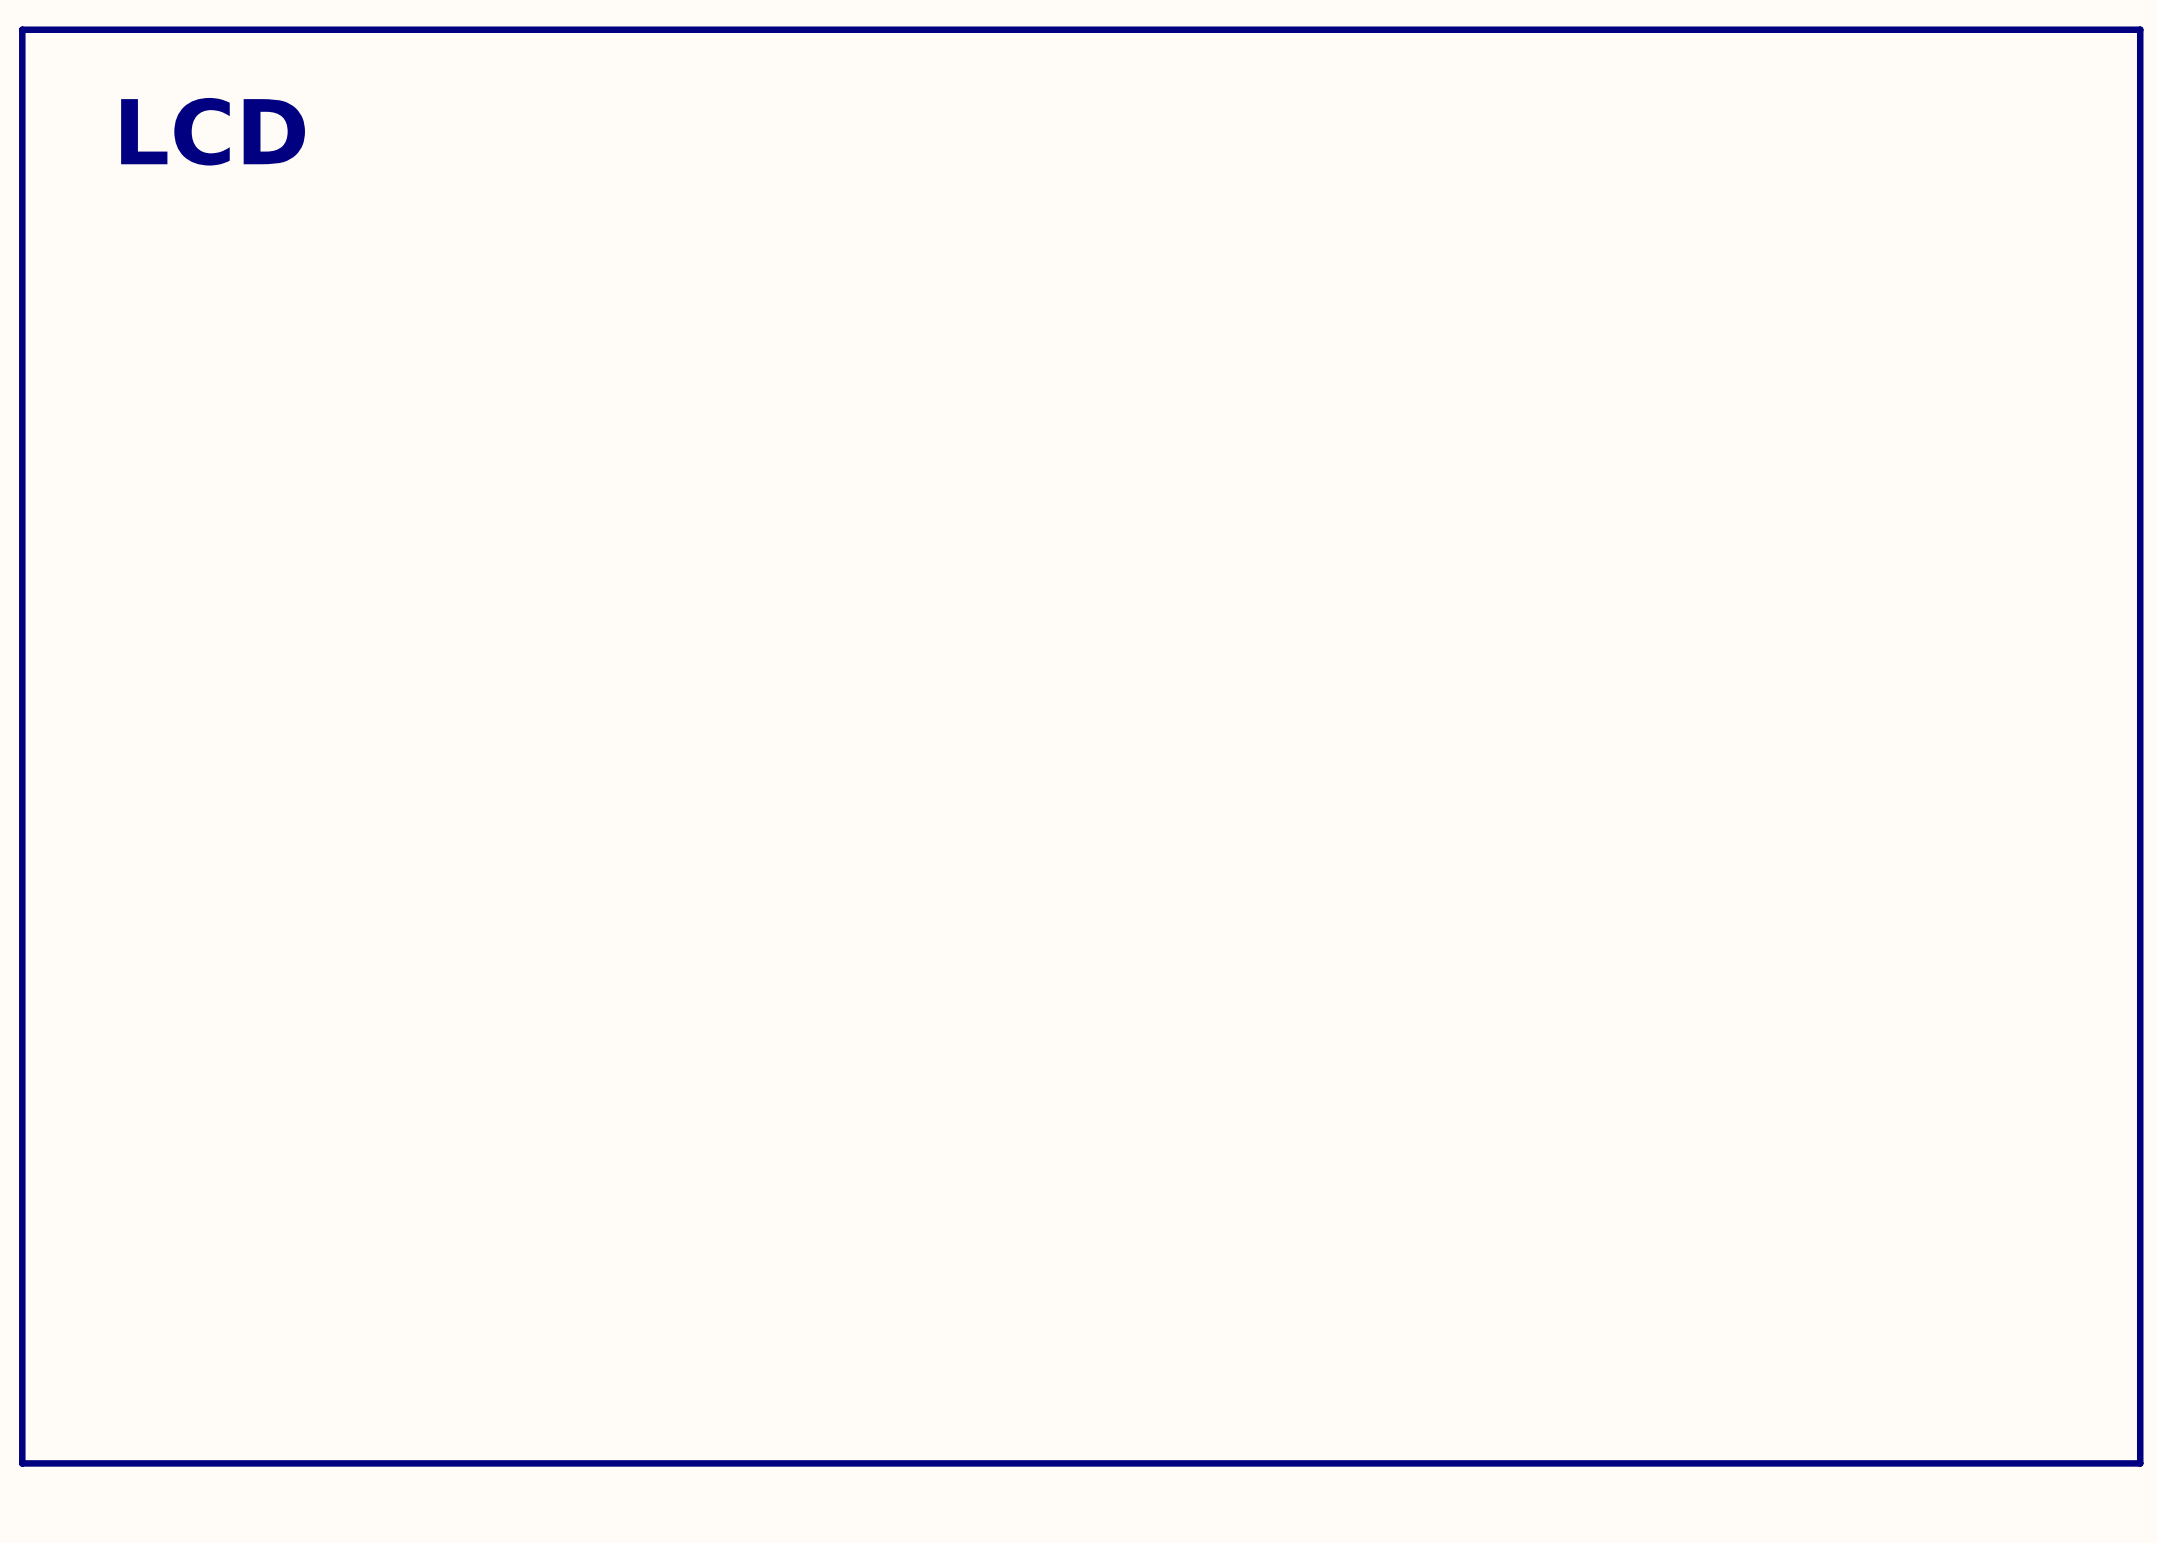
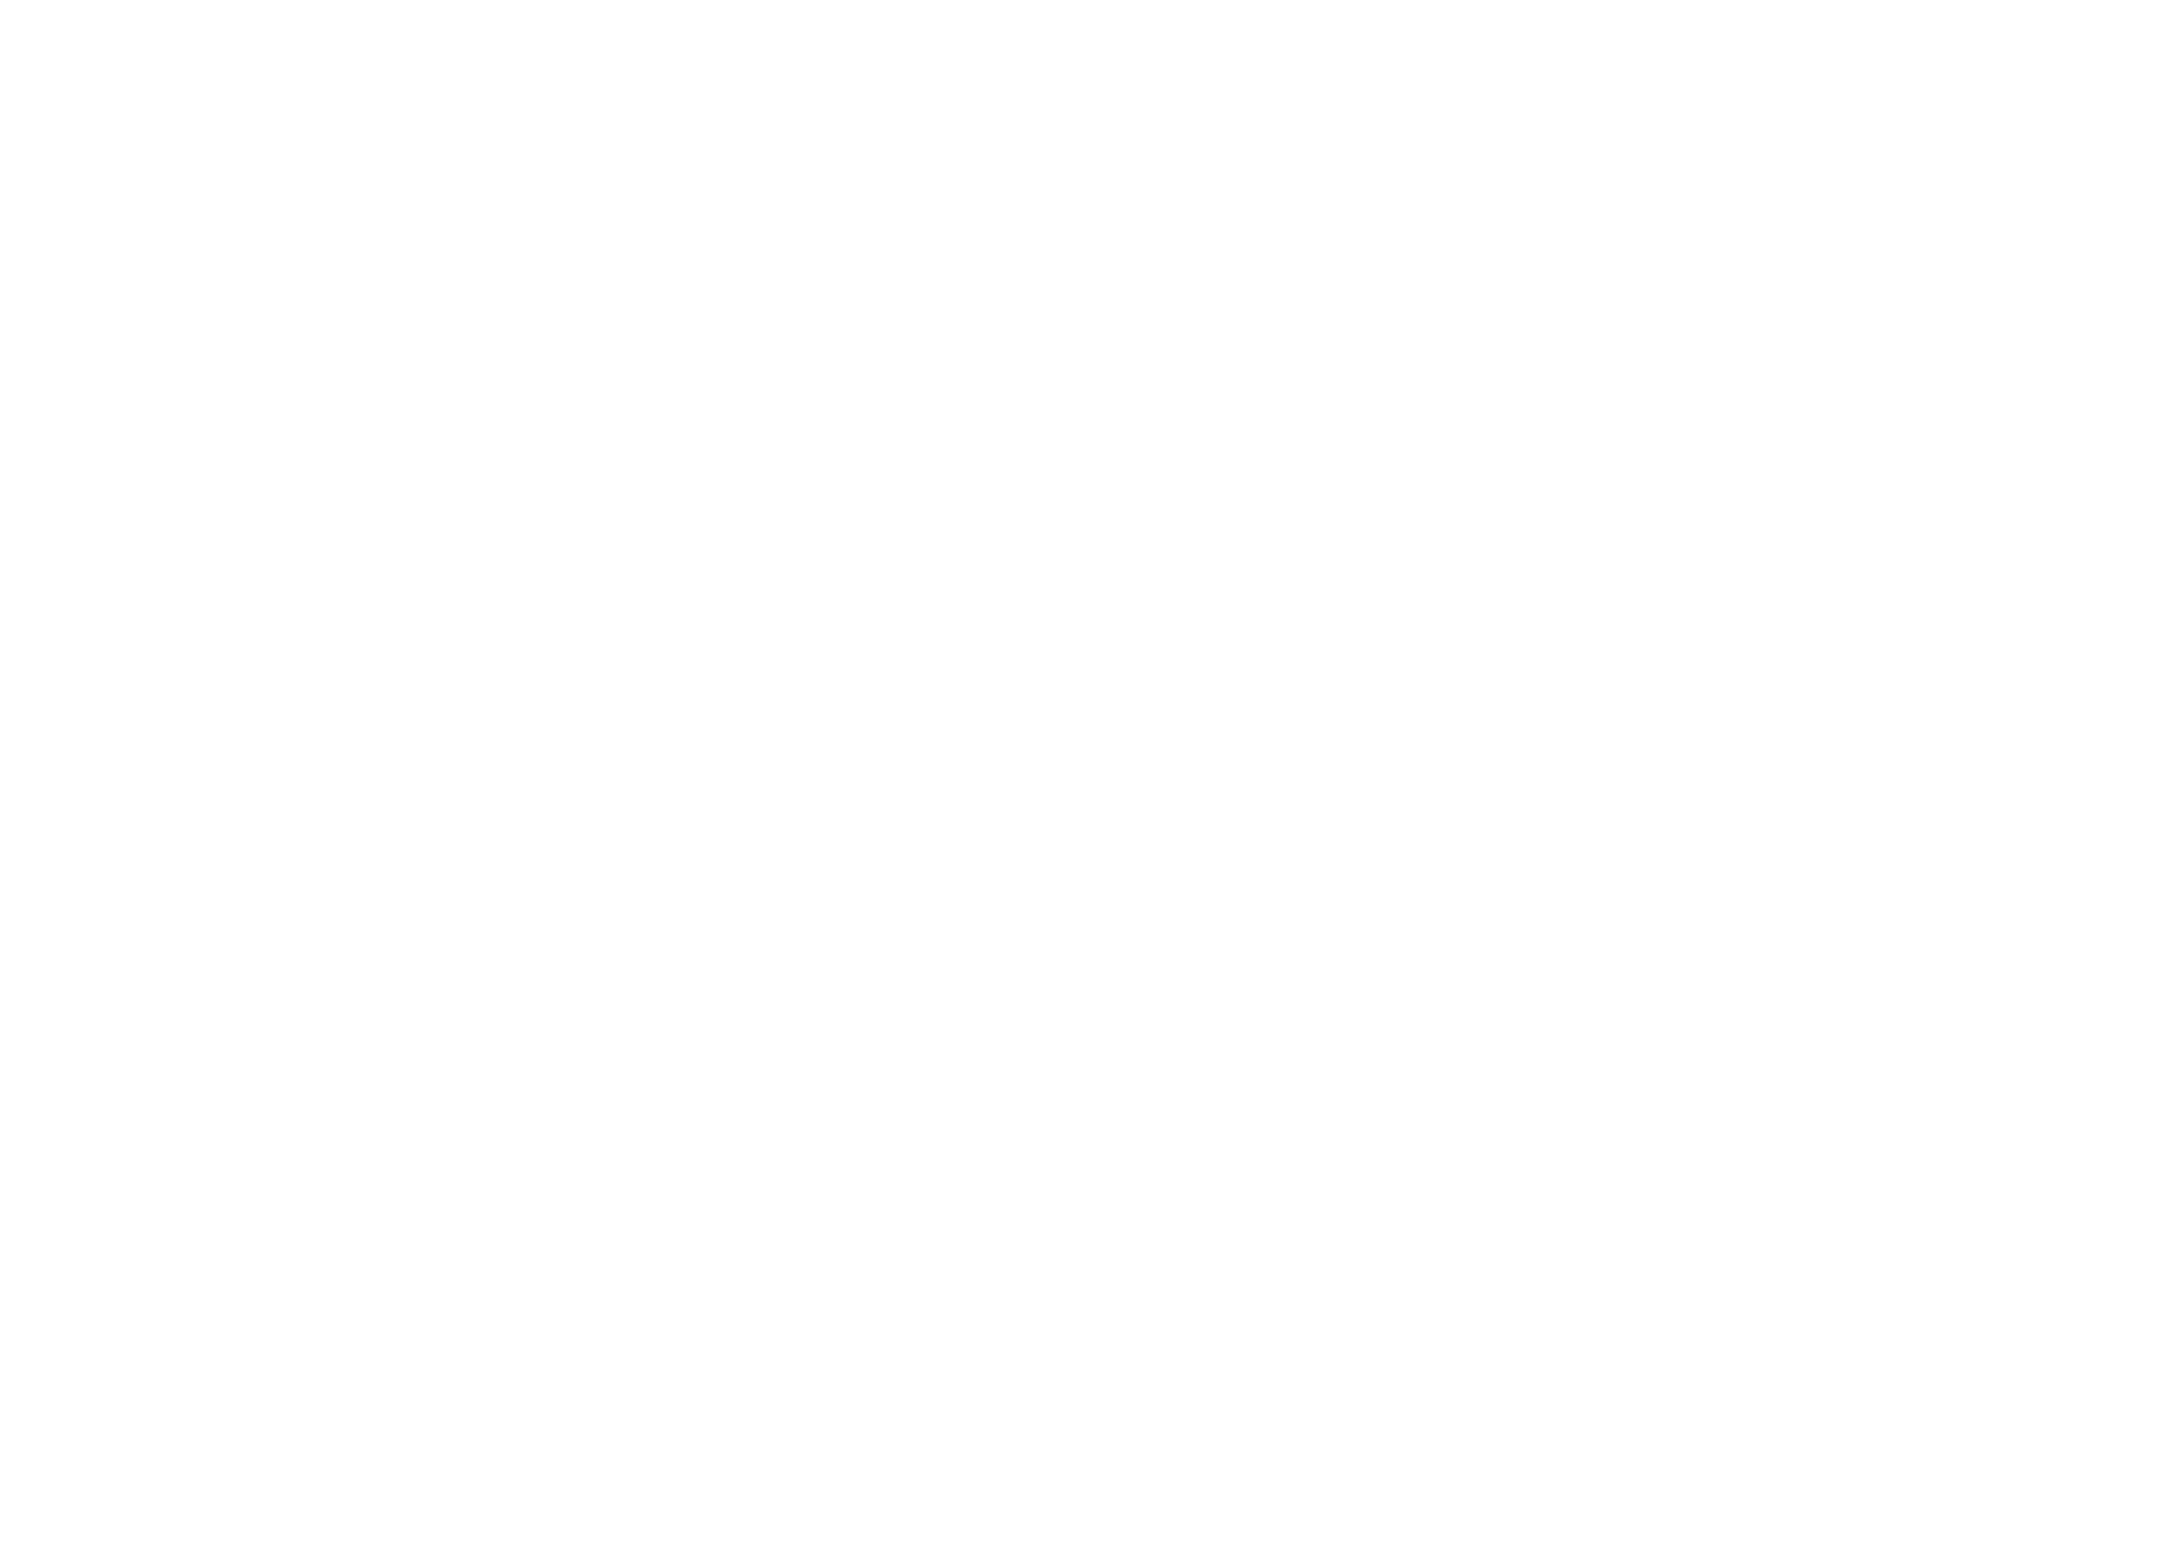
line: (22, 29) (2140, 29) (2140, 1463) (22, 1463) (22, 29) -> none
text: LCD (213, 131) -> none

